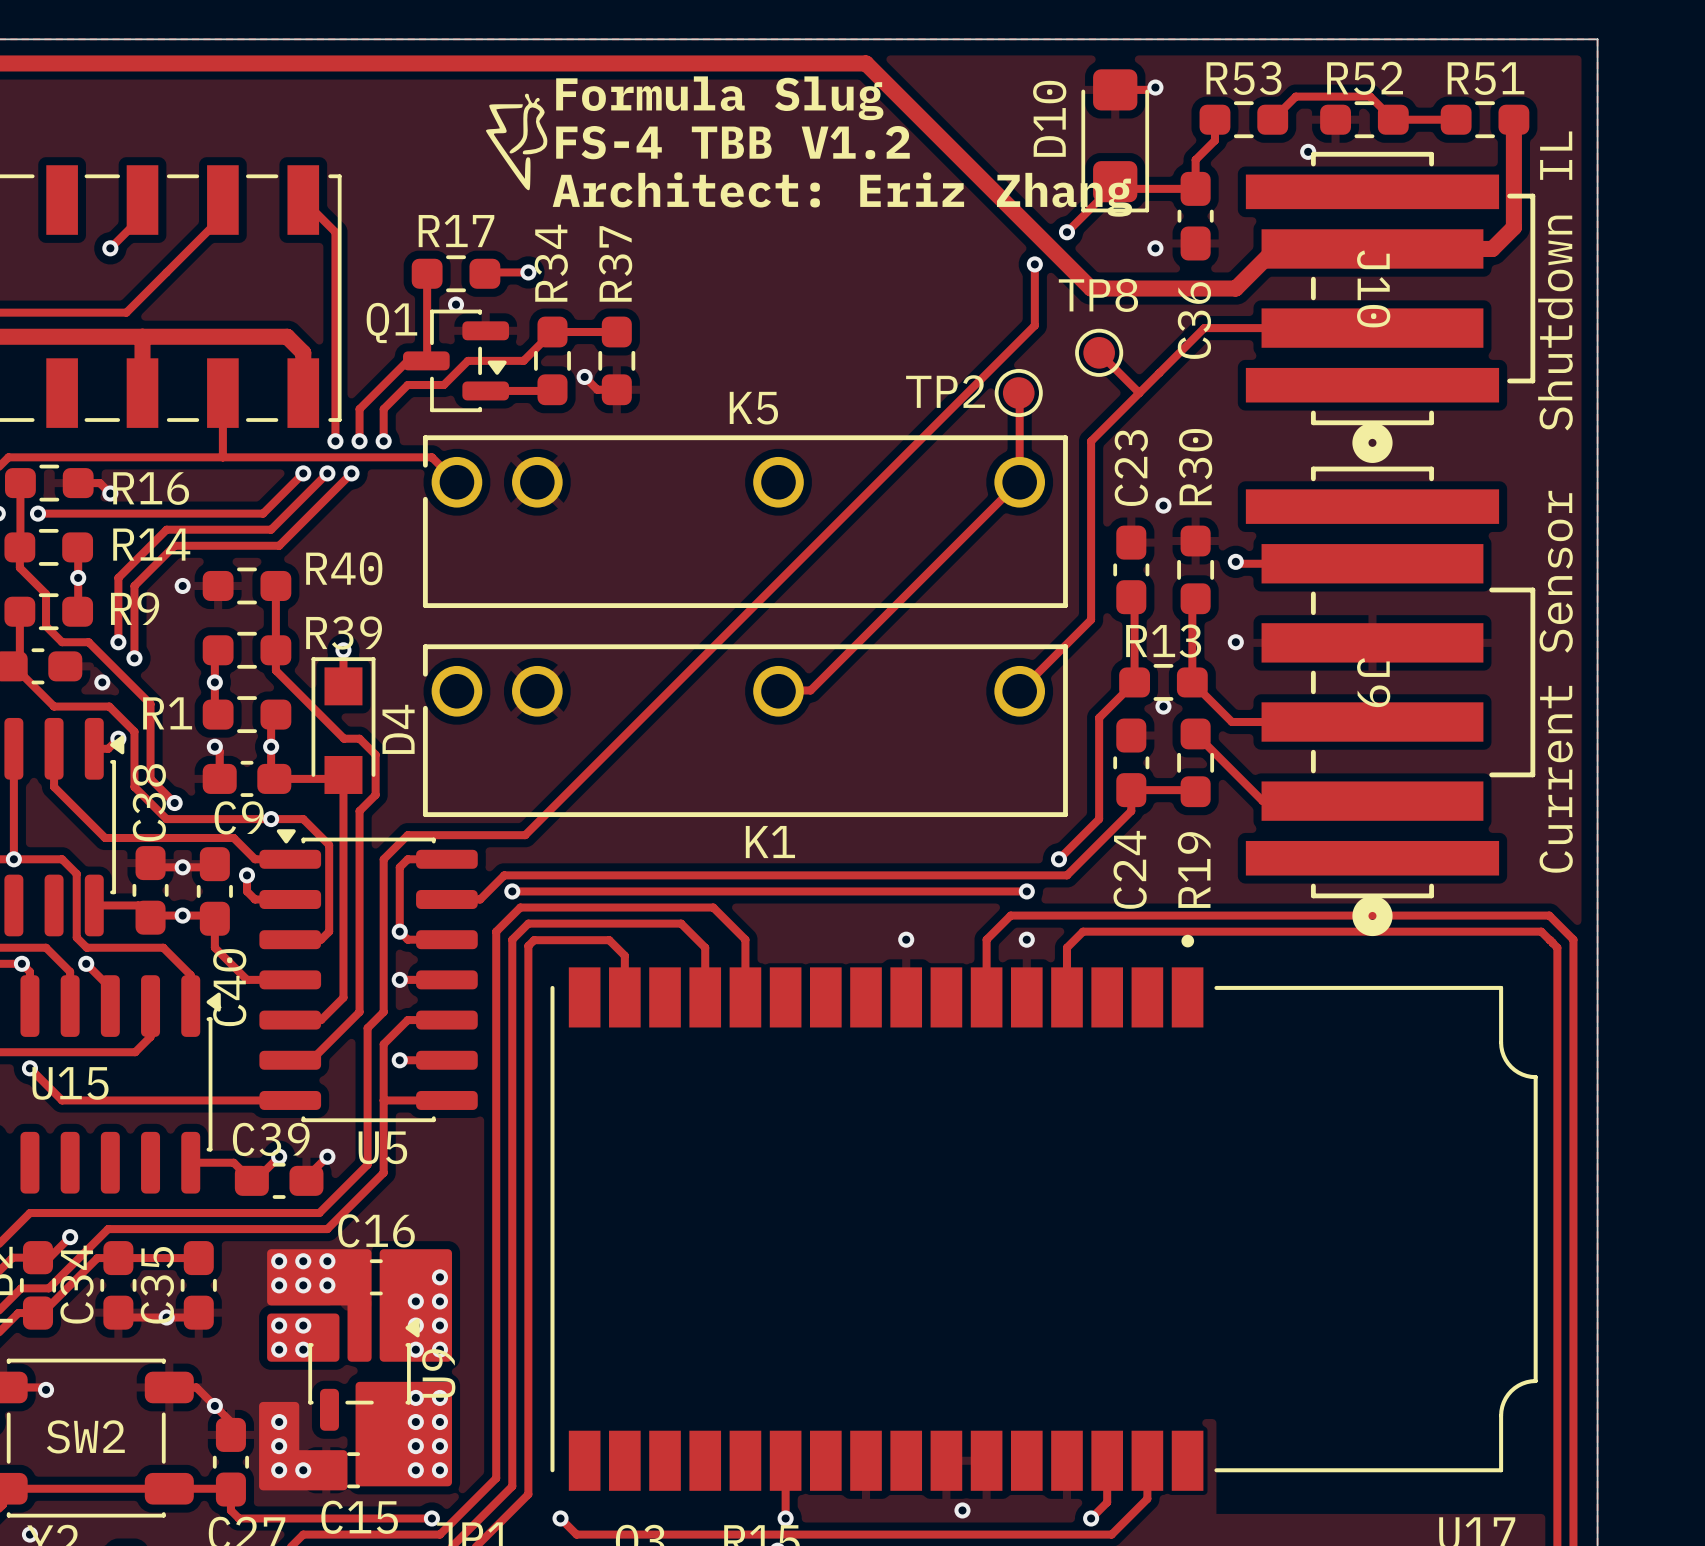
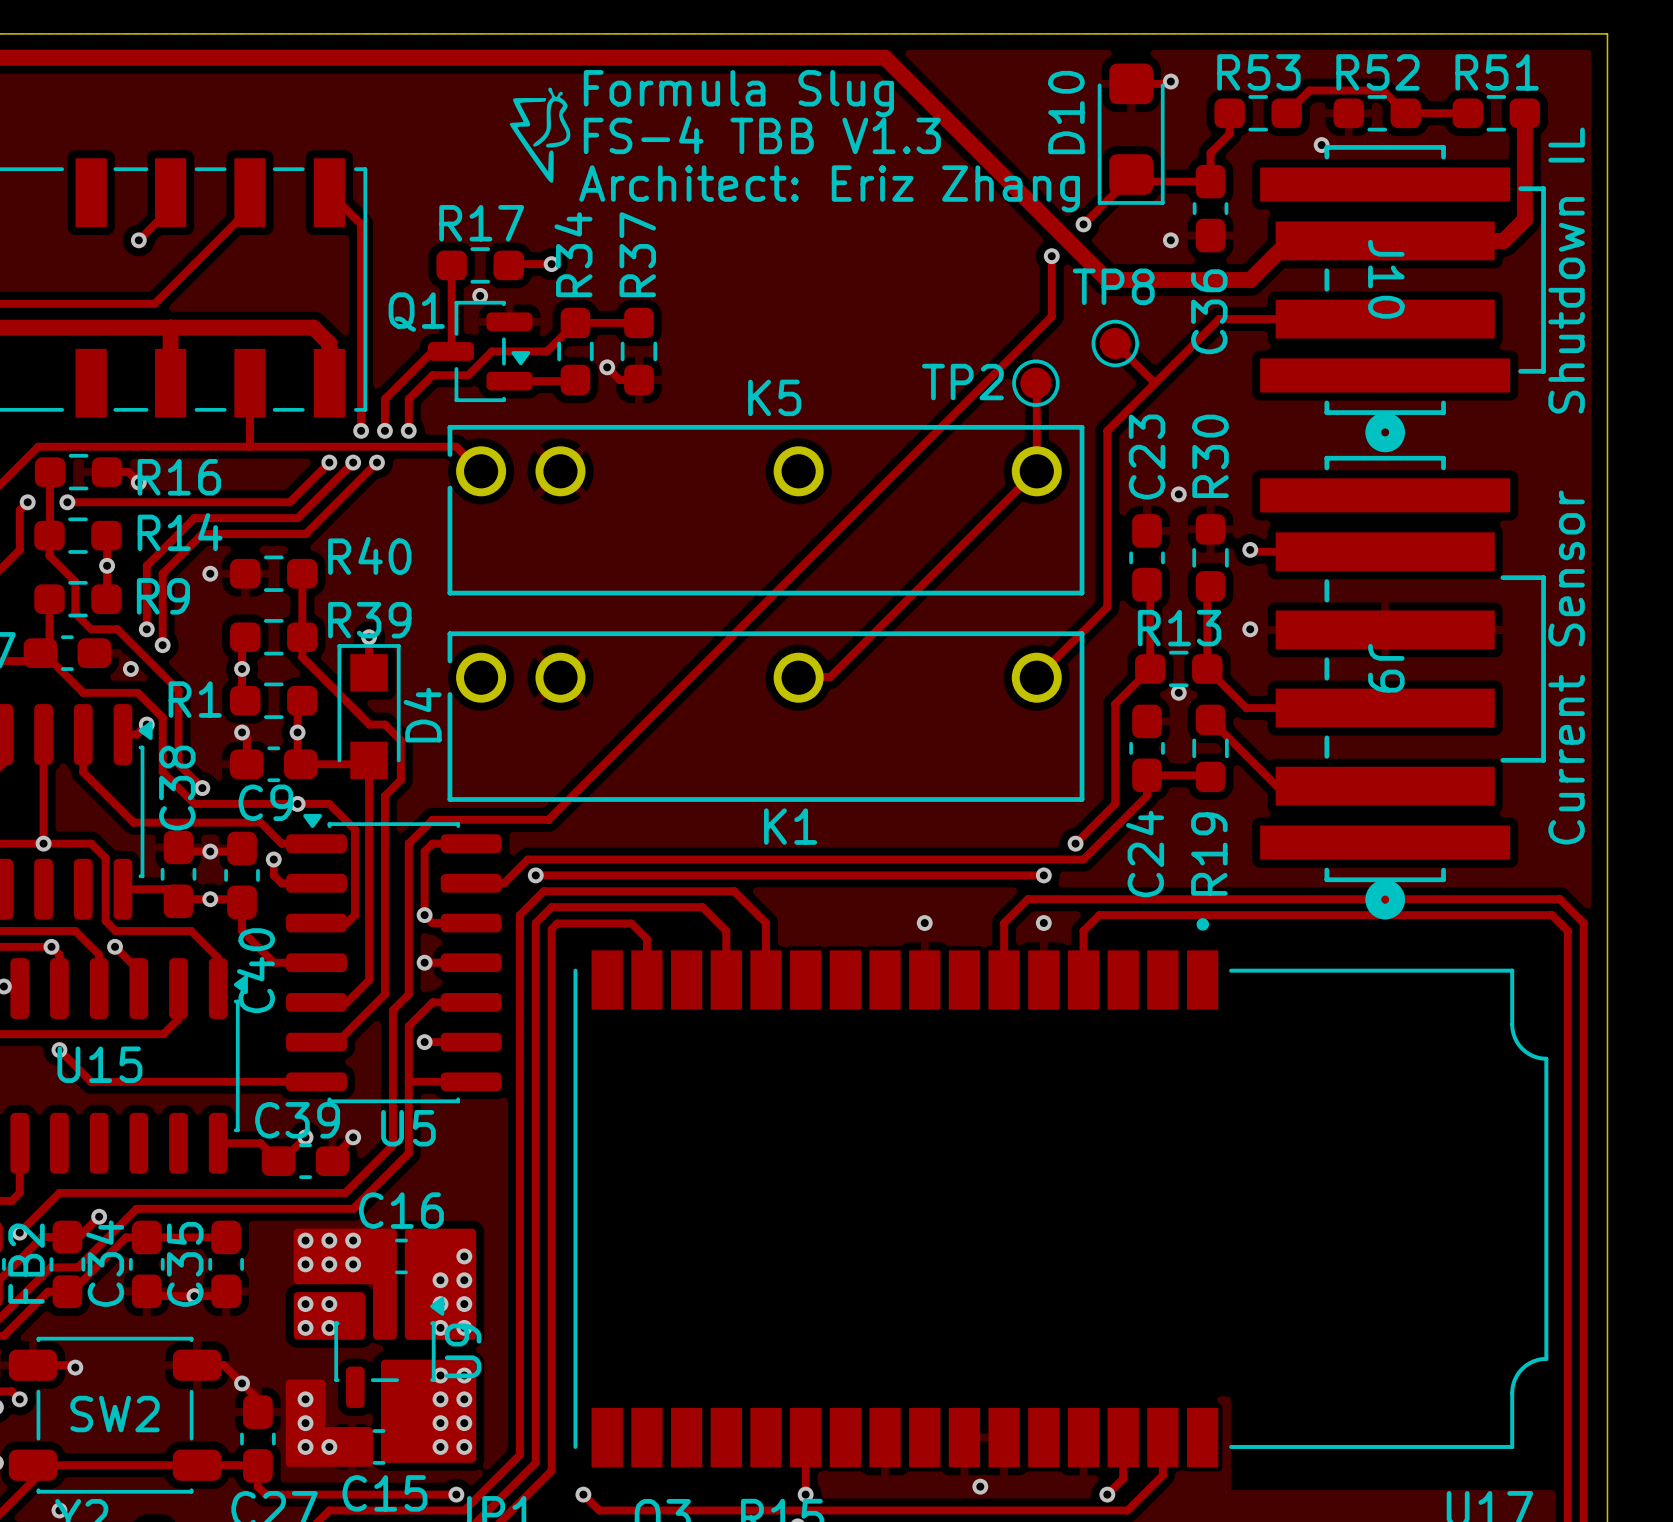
drawing shape: [485, 76, 1133, 217] -> [509, 70, 1080, 213]

